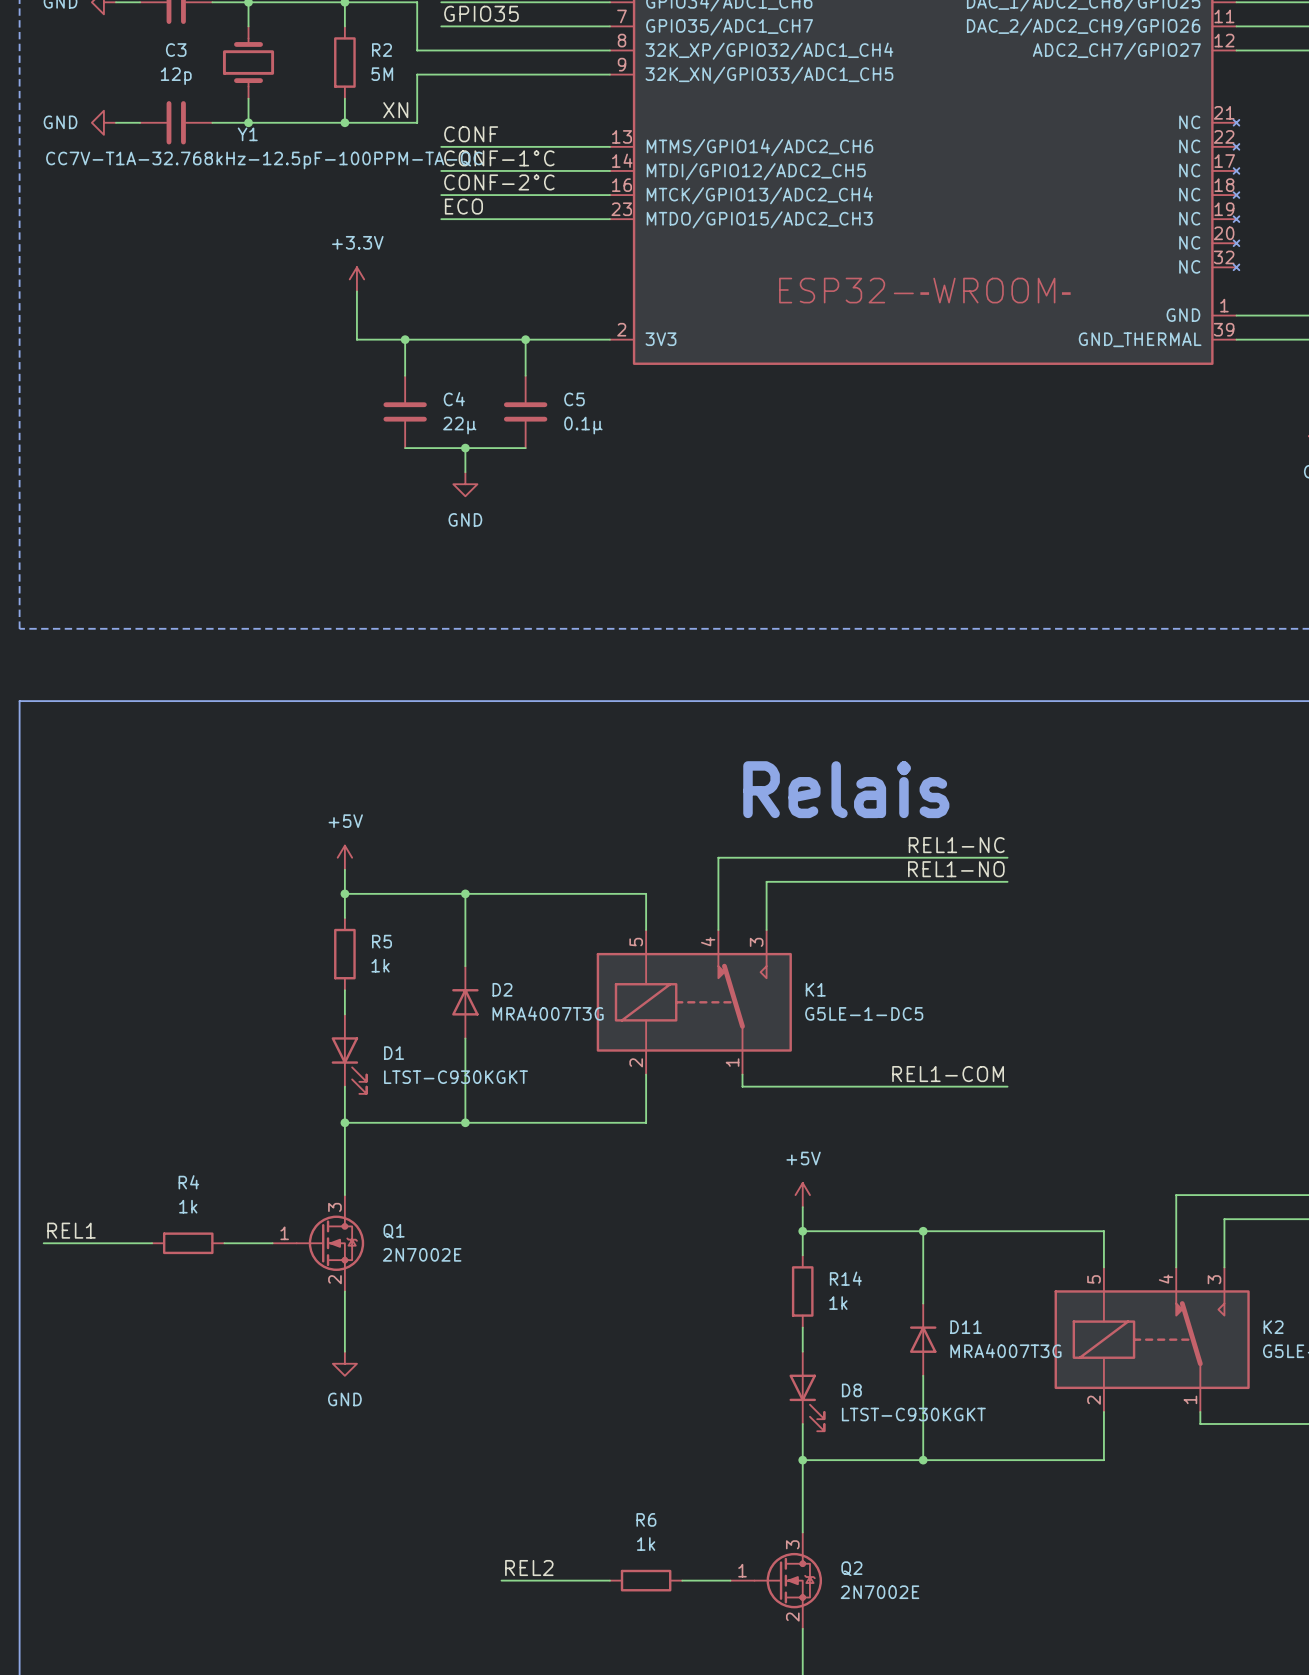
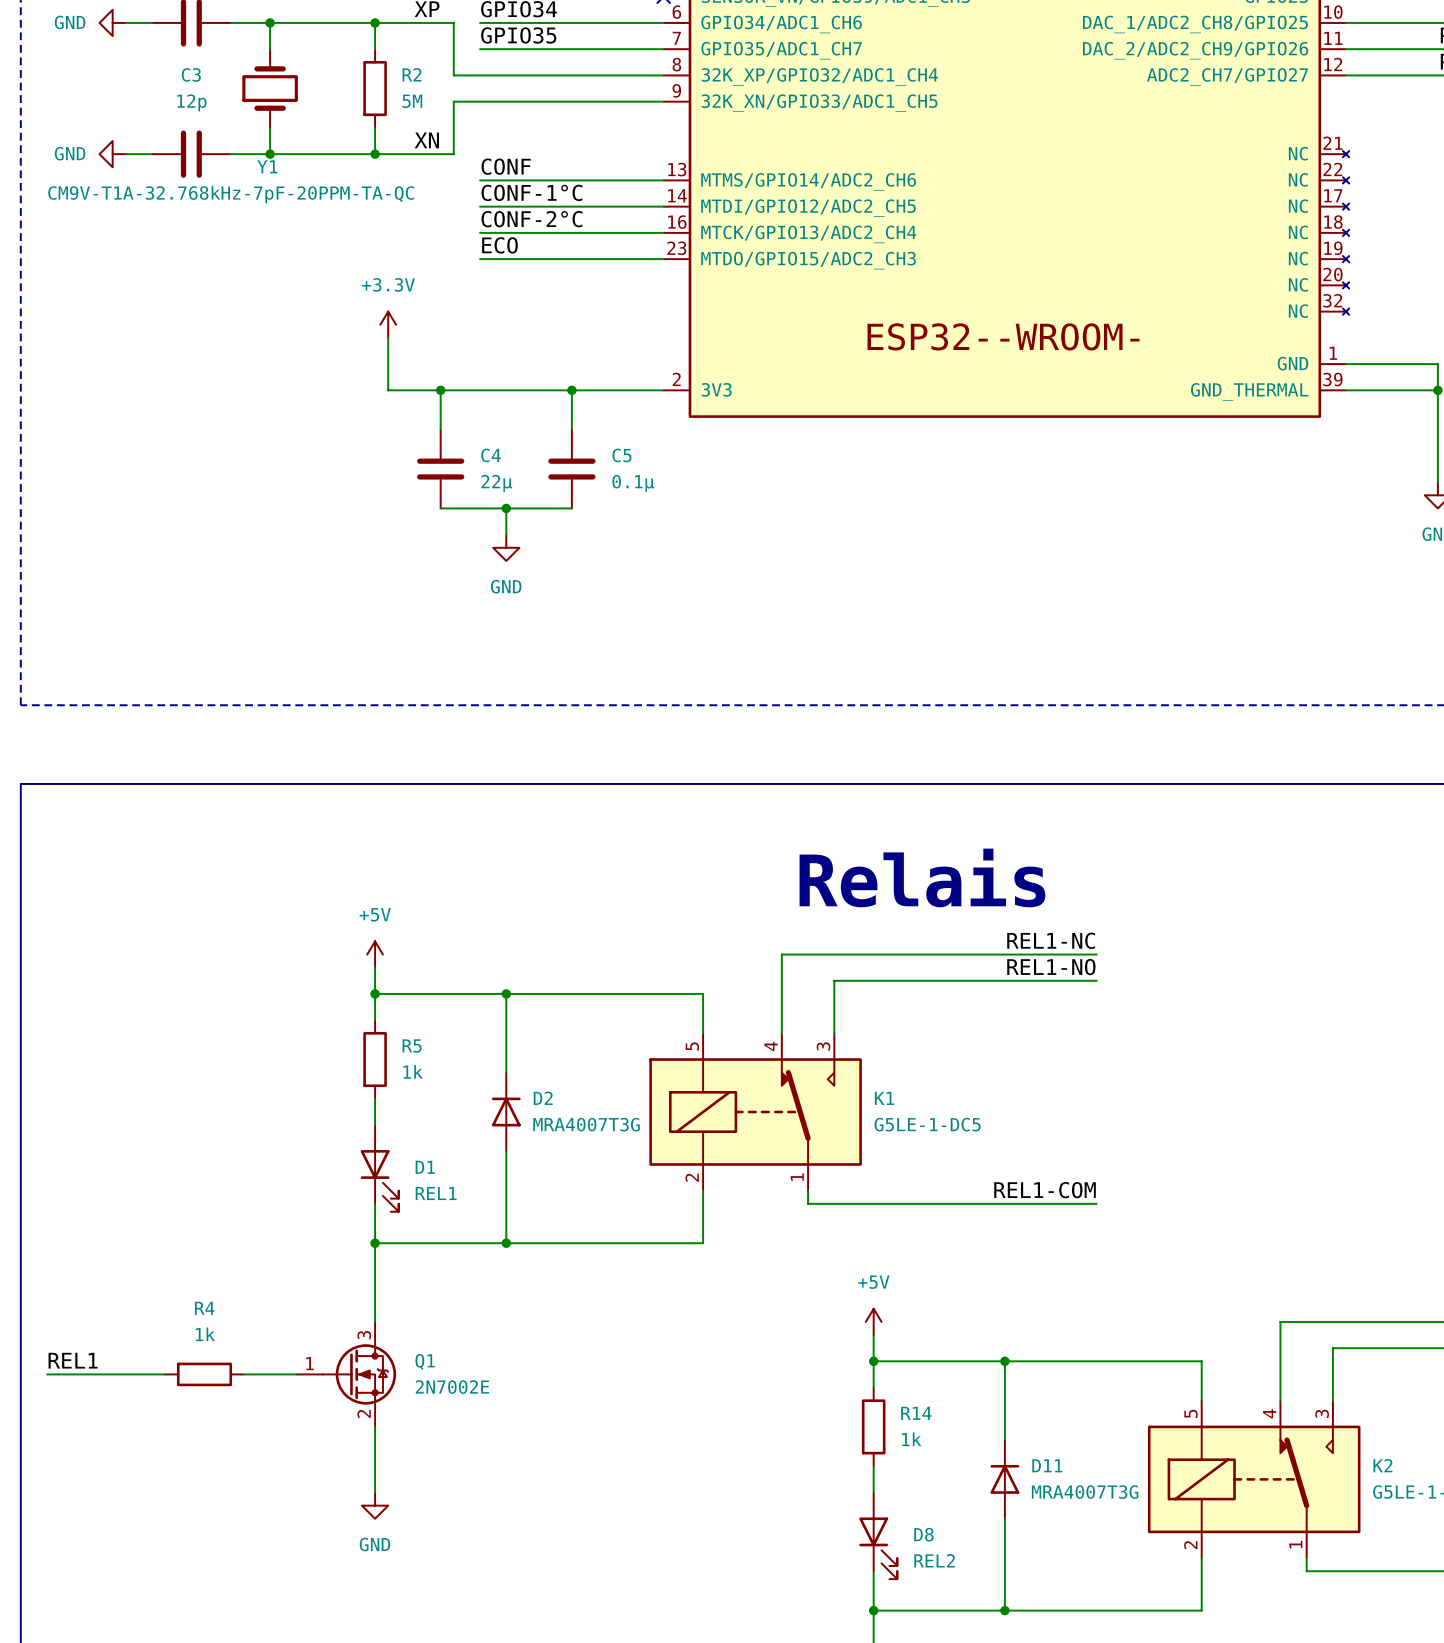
Y1 value: CC7V-T1A-32.768kHz-12.5pF-100PPM-TA-QC (264, 160) -> CM9V-T1A-32.768kHz-7pF-20PPM-TA-QC (231, 194)
D1 value: LTST-C930KGKT (456, 1077) -> REL1 (436, 1193)
D8 value: LTST-C930KGKT (913, 1414) -> REL2 (934, 1560)

